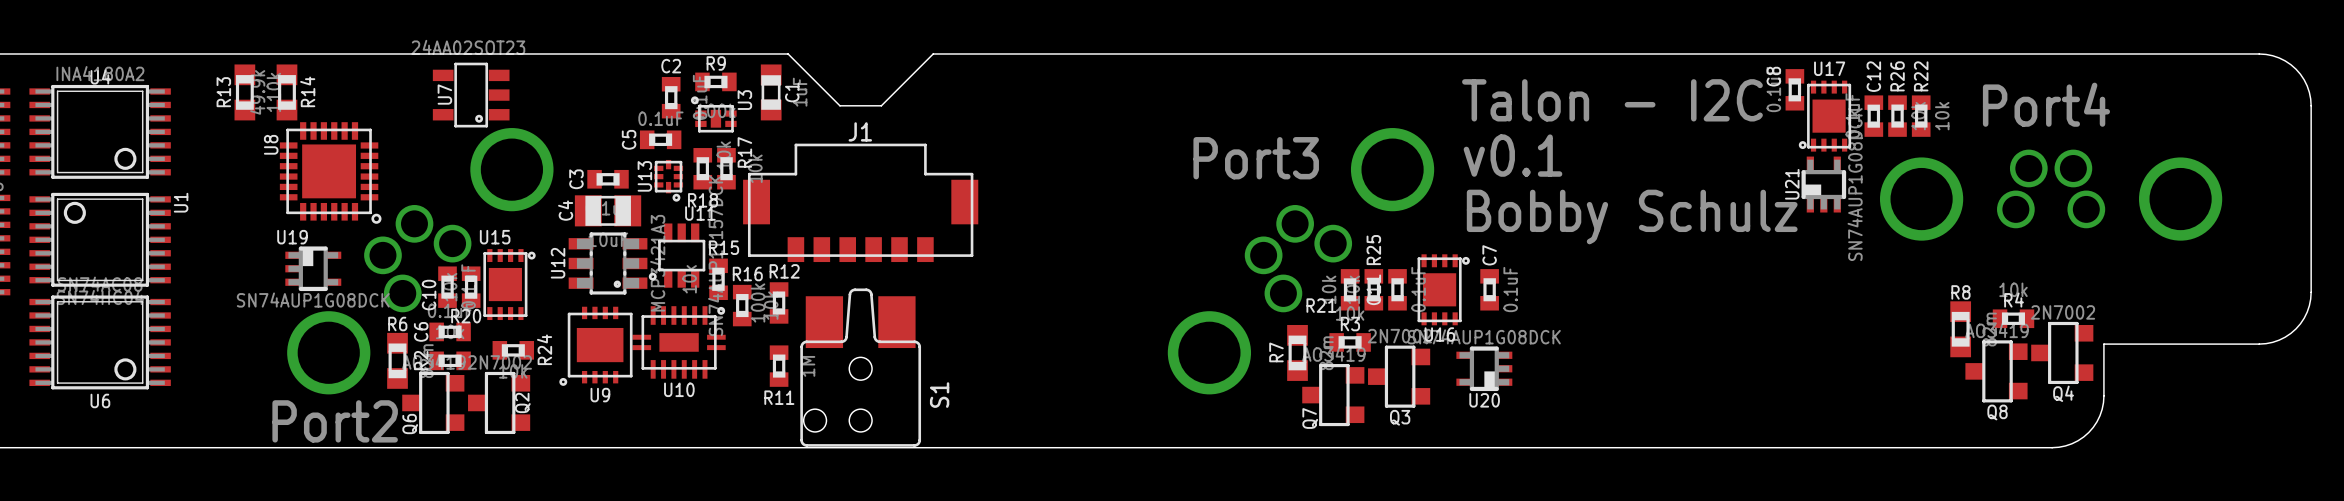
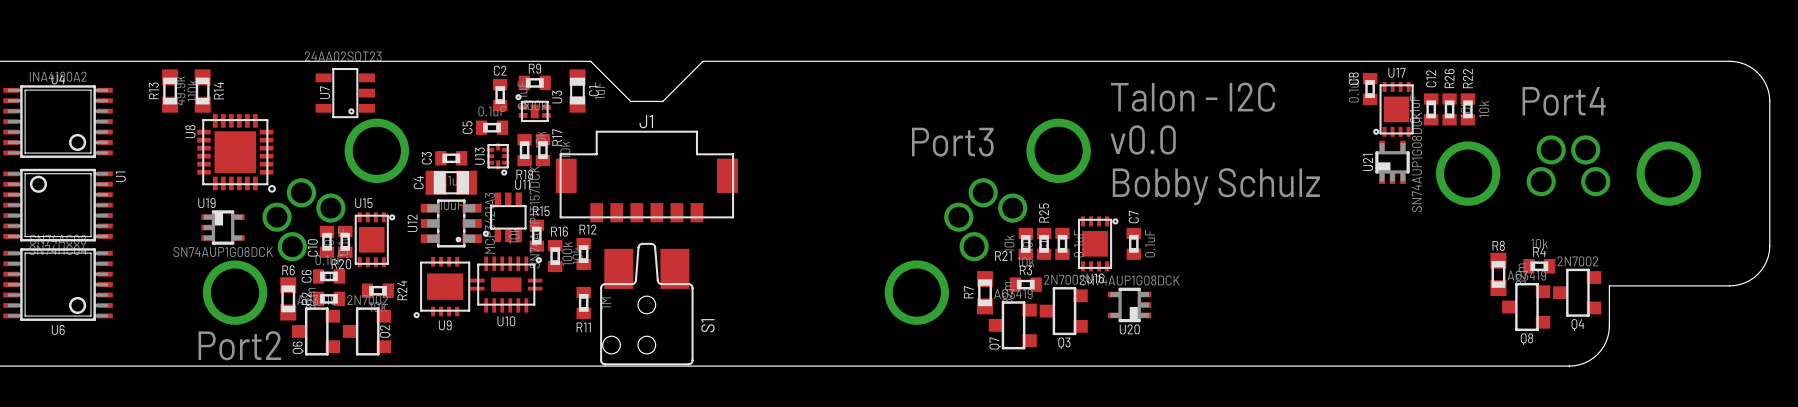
text: v0.1 (1512, 155) -> v0.0 (1143, 139)

